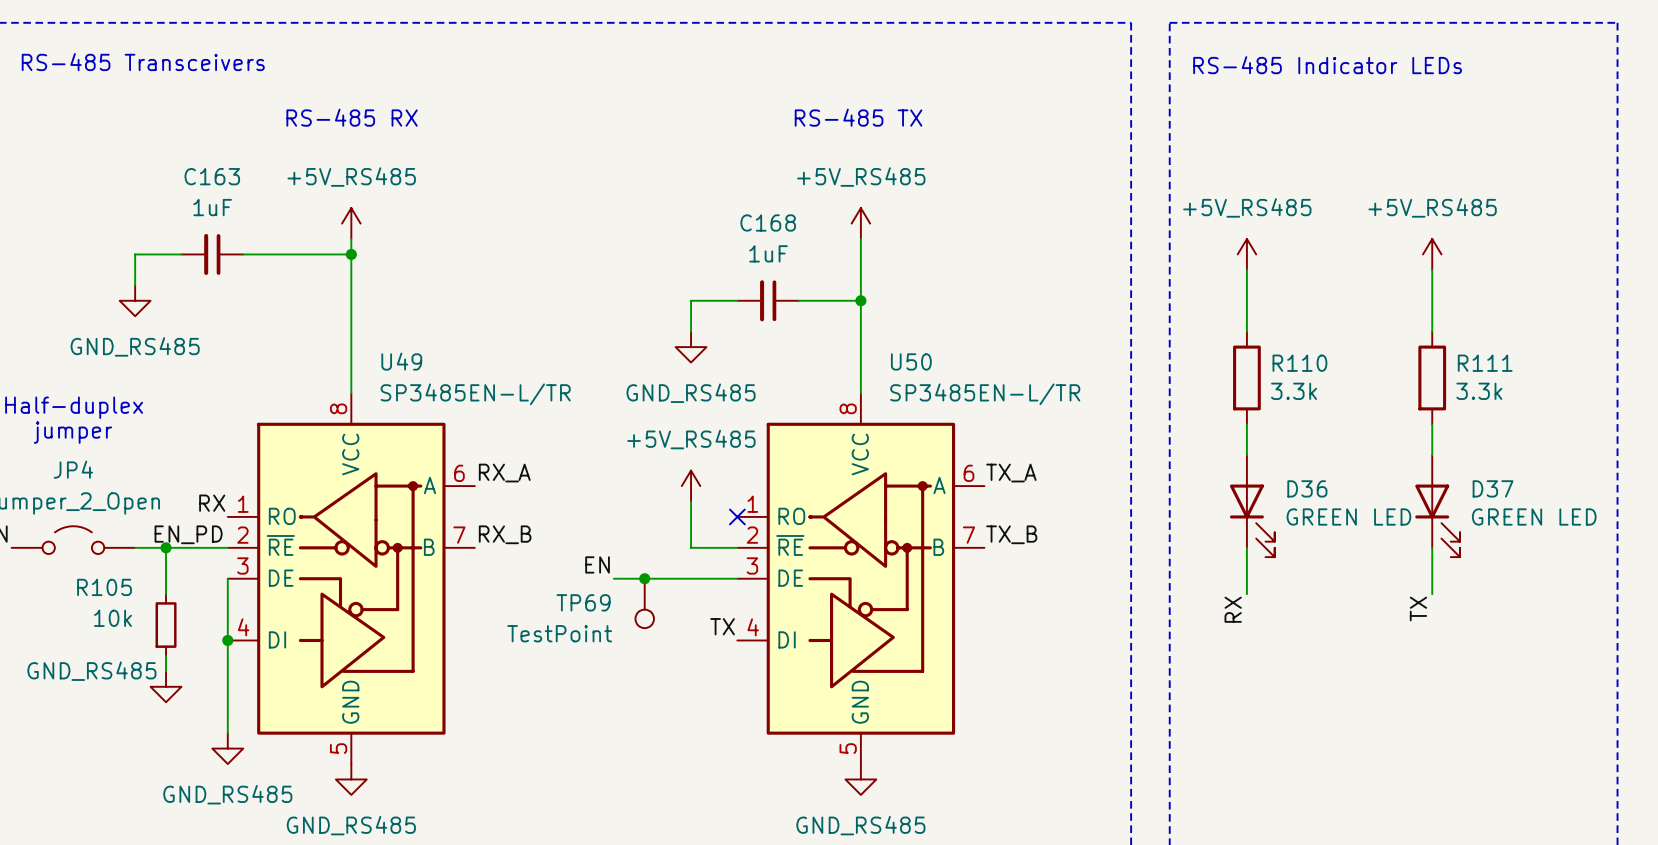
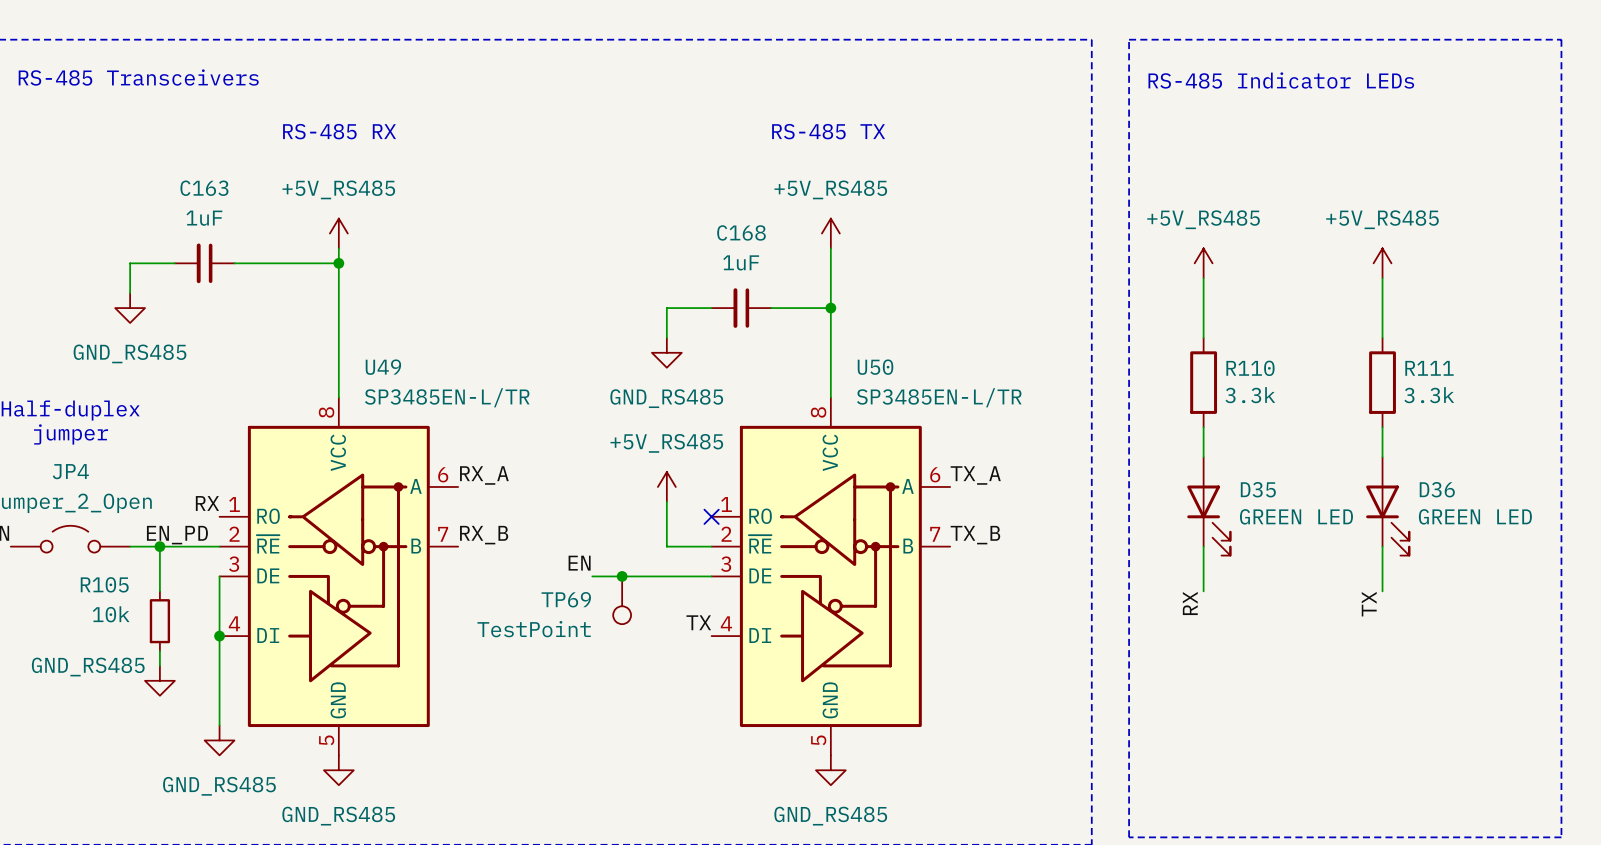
D36 name: D36 (1307, 488) -> D35 (1258, 489)
D37 name: D37 (1493, 488) -> D36 (1437, 489)

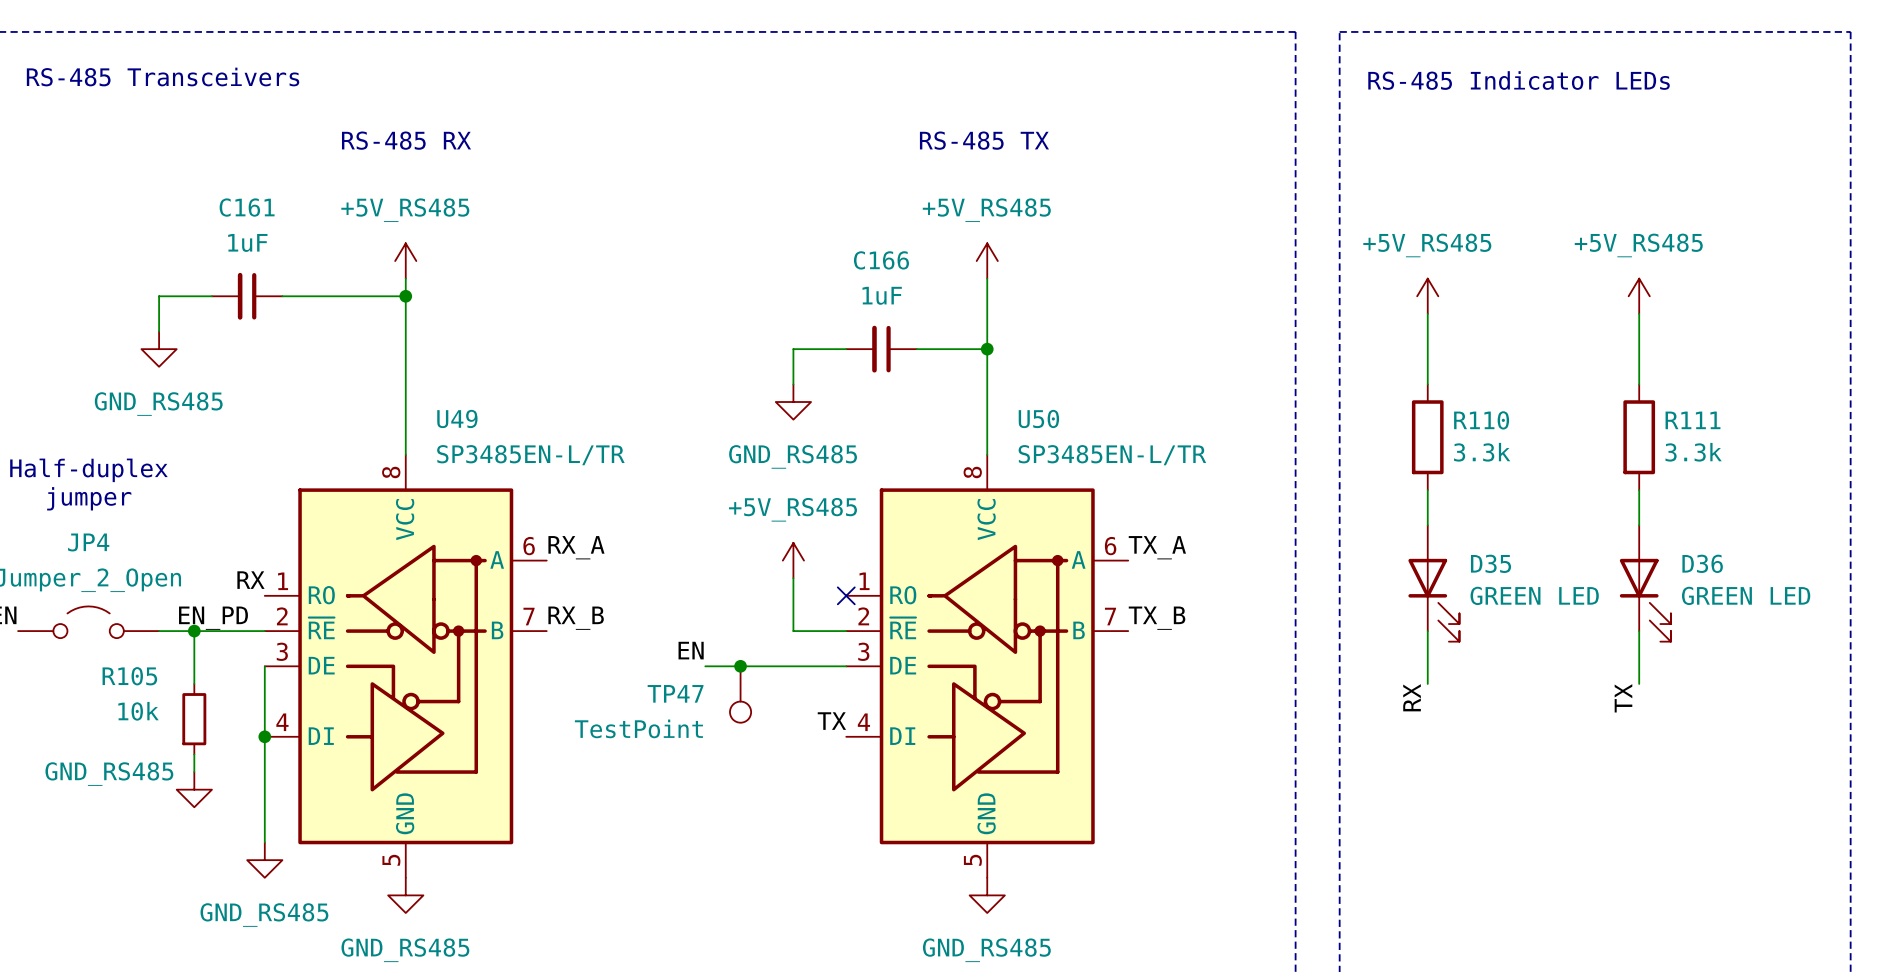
C163 name: C163 (204, 188) -> C161 (247, 207)
C168 name: C168 (741, 232) -> C166 (881, 260)
TP69 name: TP69 (566, 599) -> TP47 (675, 693)

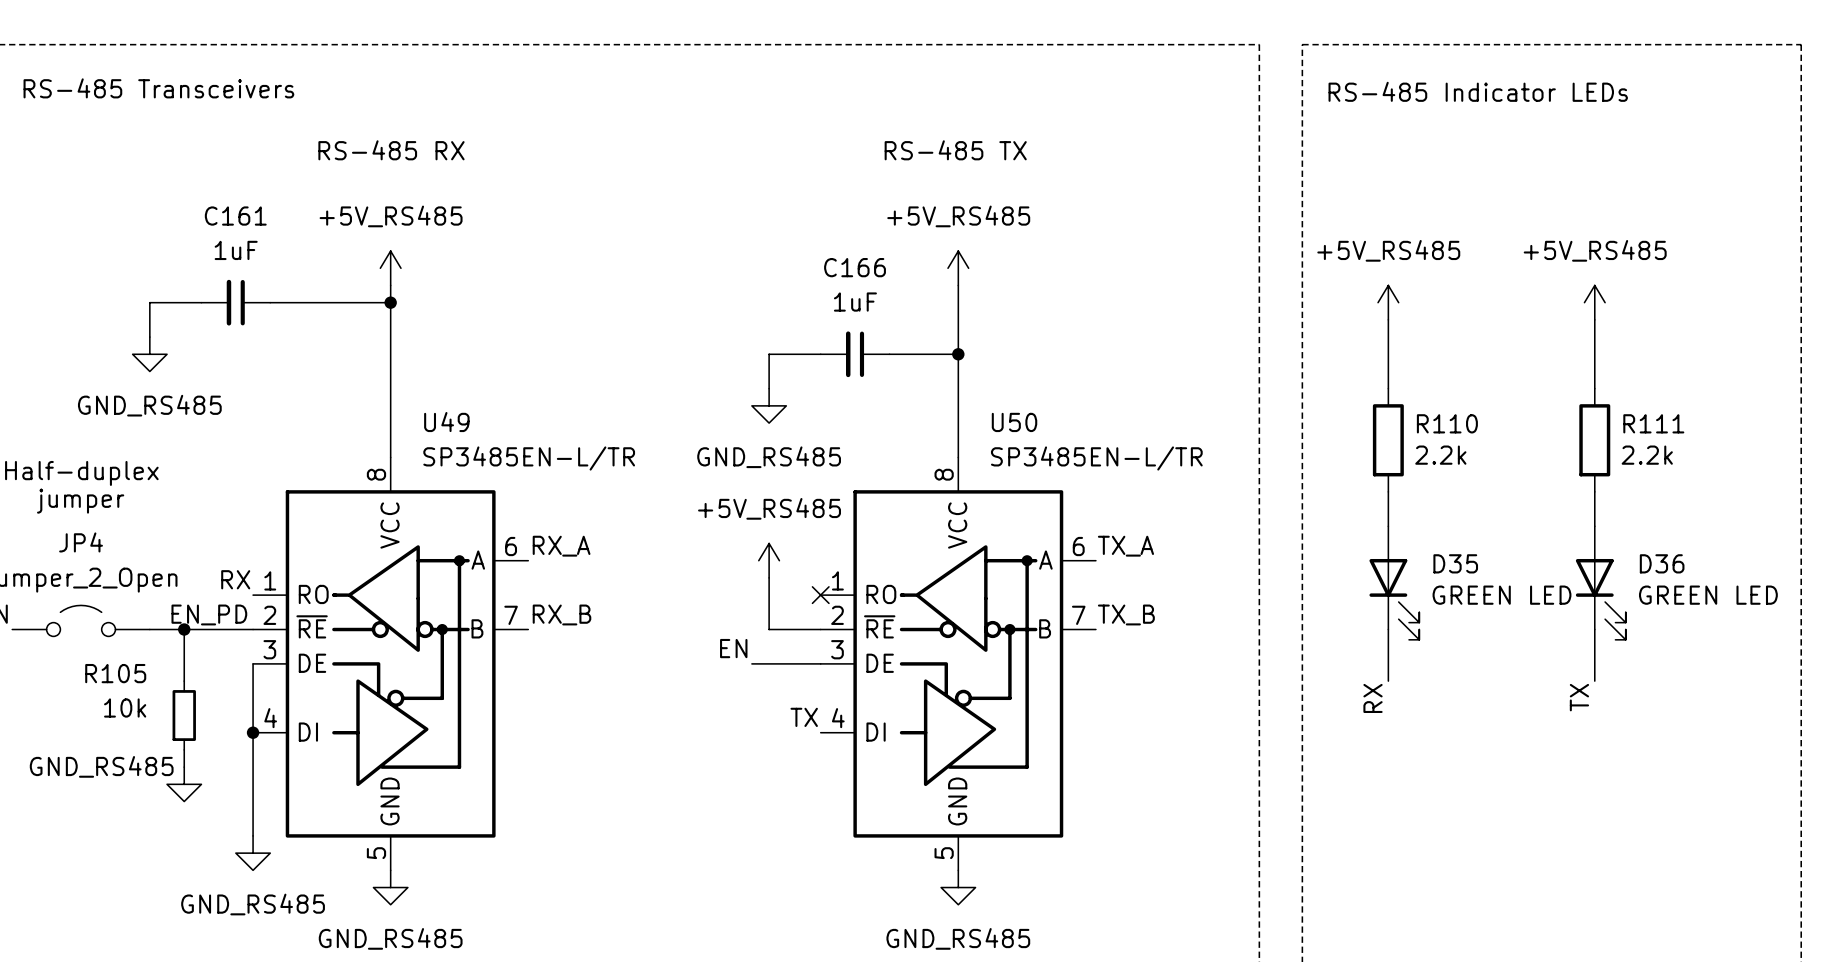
R110 value: 3.3k (1482, 452) -> 2.2k (1440, 455)
R111 value: 3.3k (1693, 452) -> 2.2k (1647, 455)
label position: EN (691, 650) -> EN (733, 648)
wire: (705, 666) (775, 666) -> none
junction: (740, 666) -> none
TP47: TestPoint (740, 694) -> none

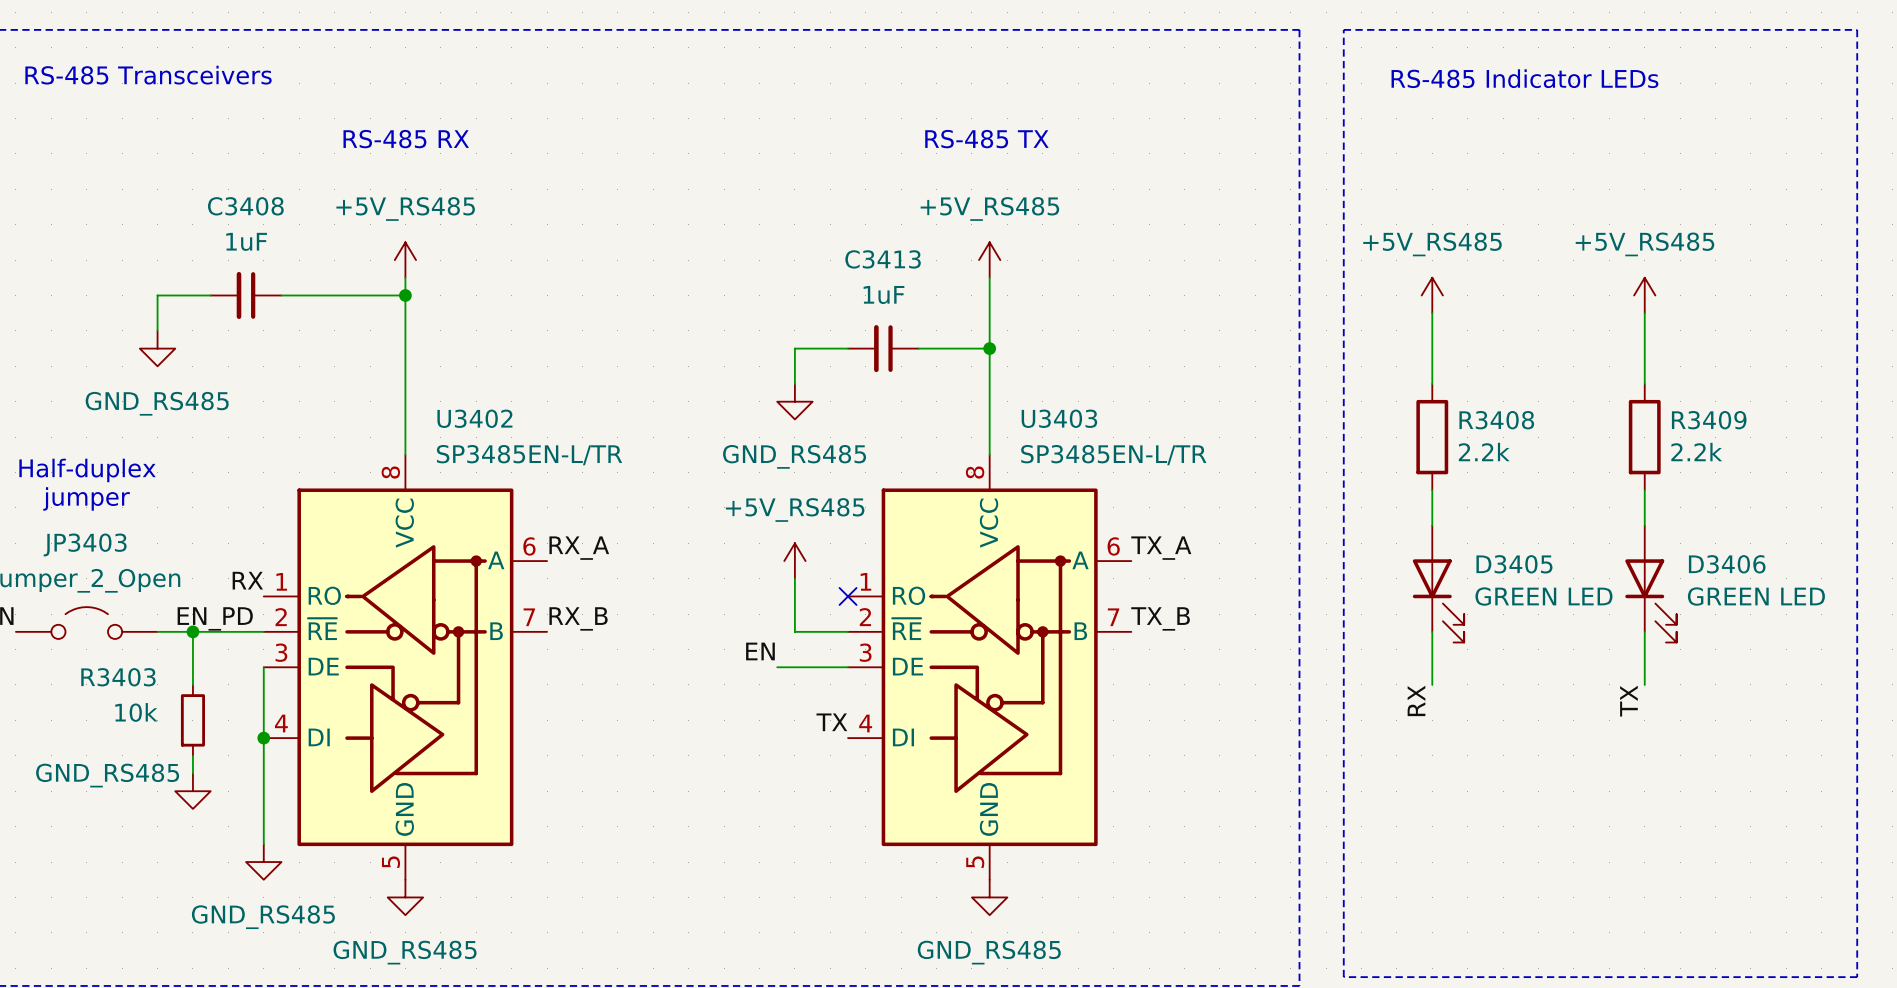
C161 name: C161 (235, 216) -> C3408 (245, 206)
C166 name: C166 (855, 267) -> C3413 (883, 259)
U49 name: U49 (446, 422) -> U3402 (474, 418)
U50 name: U50 (1014, 422) -> U3403 (1059, 418)
R110 name: R110 (1447, 423) -> R3408 (1496, 420)
R111 name: R111 (1653, 423) -> R3409 (1709, 420)
JP4 name: JP4 (81, 542) -> JP3403 (85, 544)
D35 name: D35 (1455, 563) -> D3405 (1514, 564)
D36 name: D36 (1662, 563) -> D3406 (1727, 564)
R105 name: R105 (115, 673) -> R3403 (118, 677)

